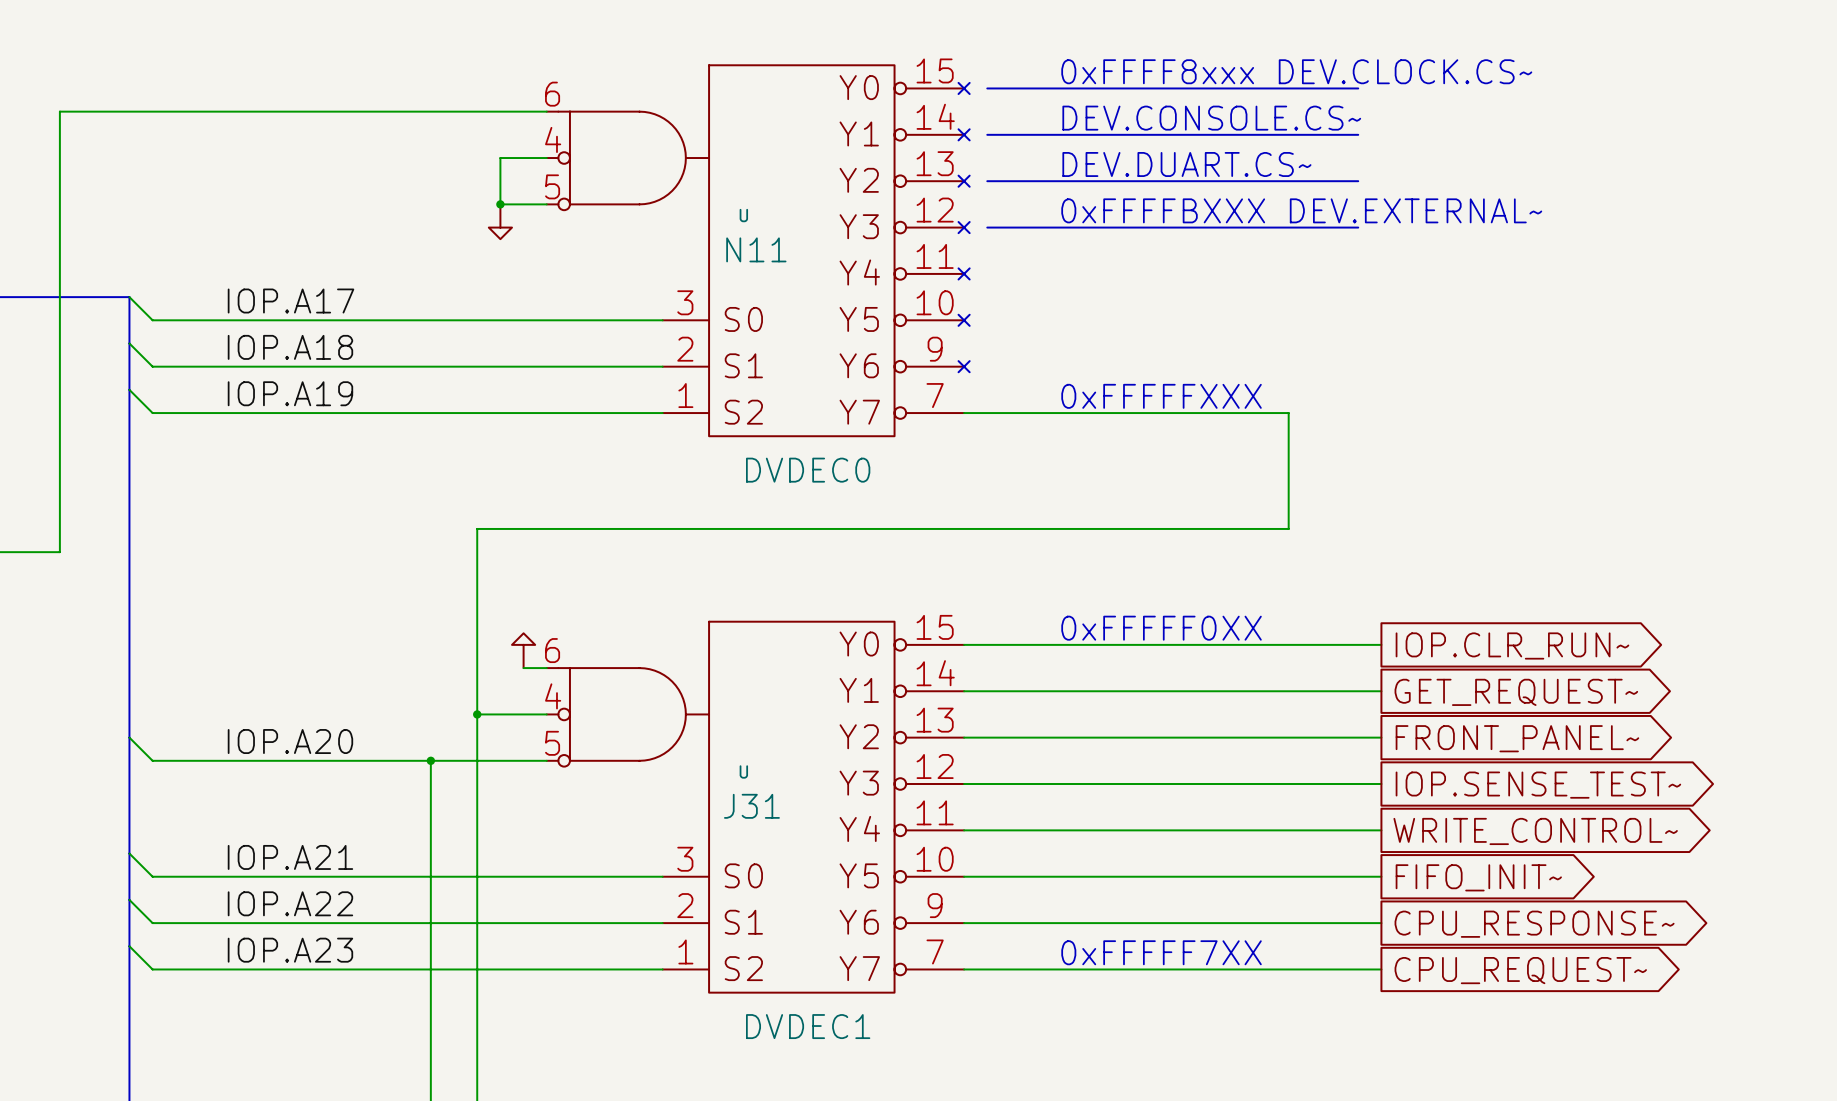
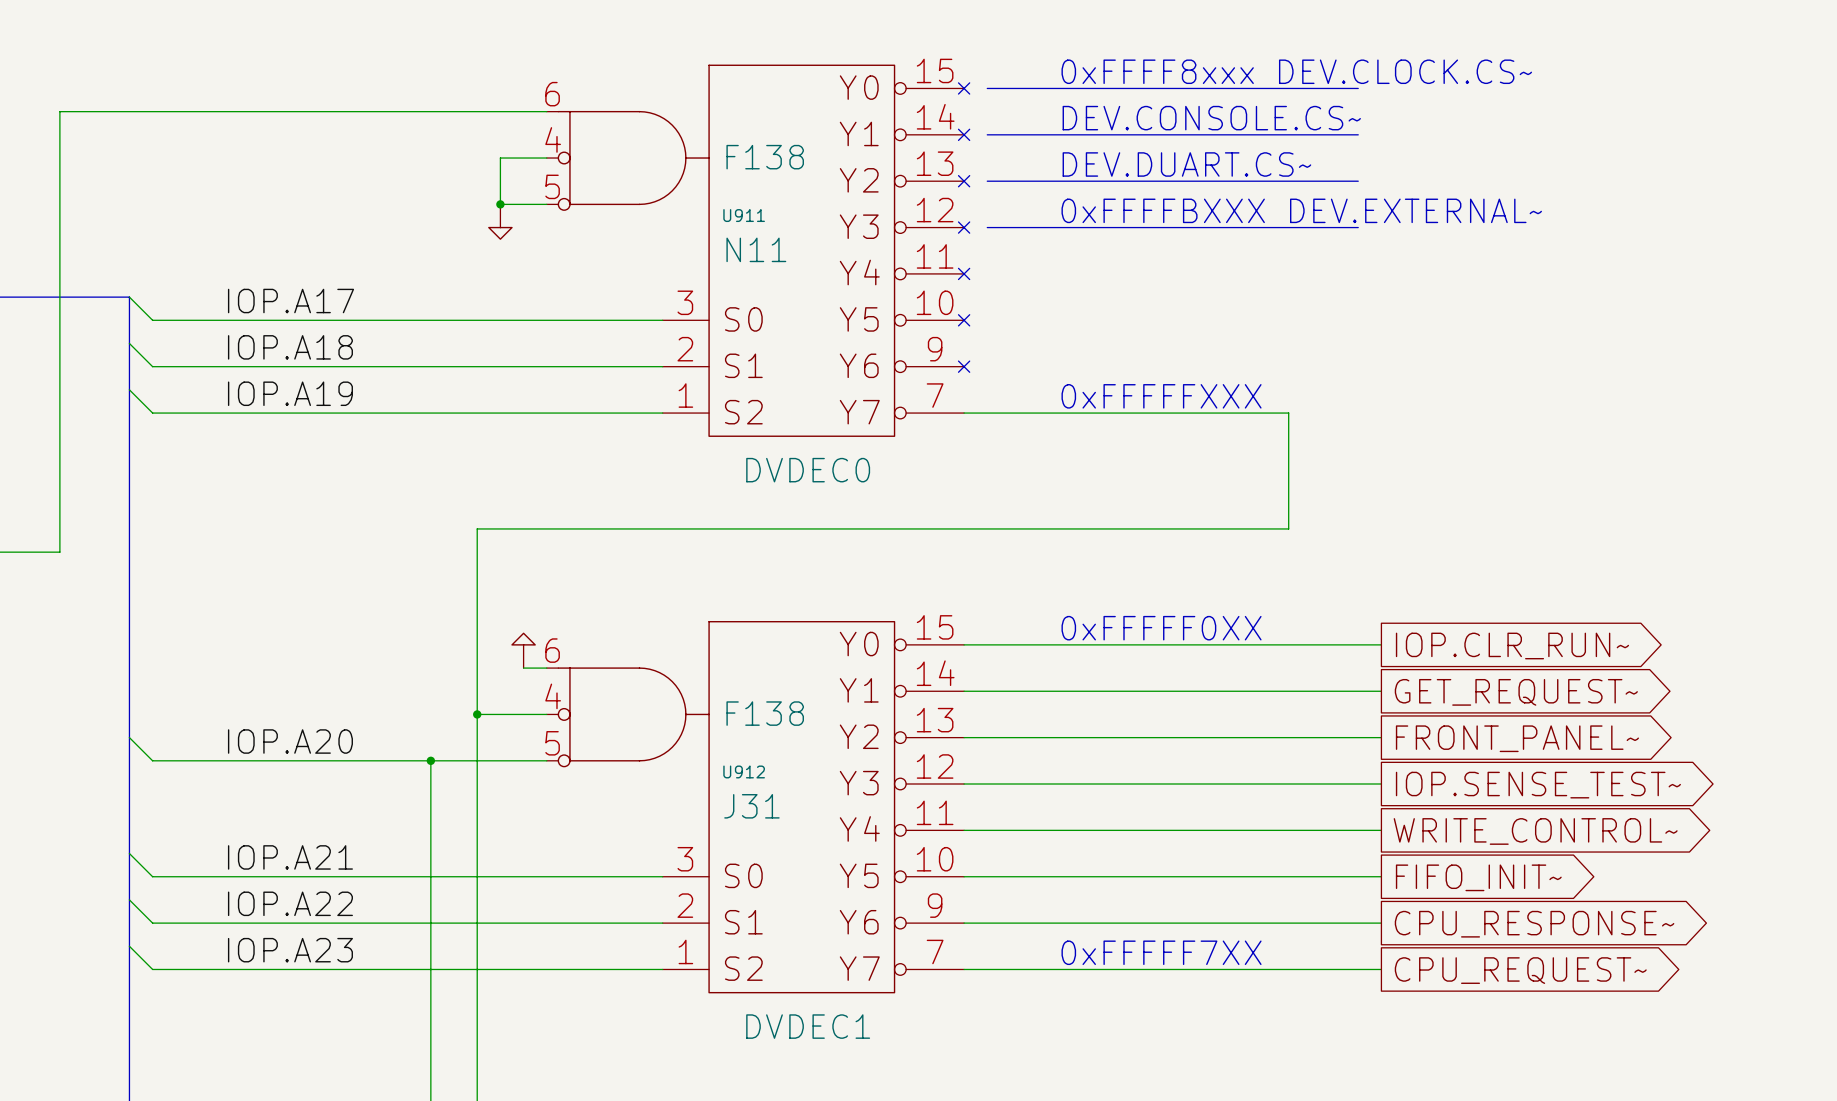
U value: none -> F138 (765, 157)
U name: U (743, 215) -> U911 (744, 215)
U value: none -> F138 (765, 713)
U name: U (743, 771) -> U912 (744, 771)

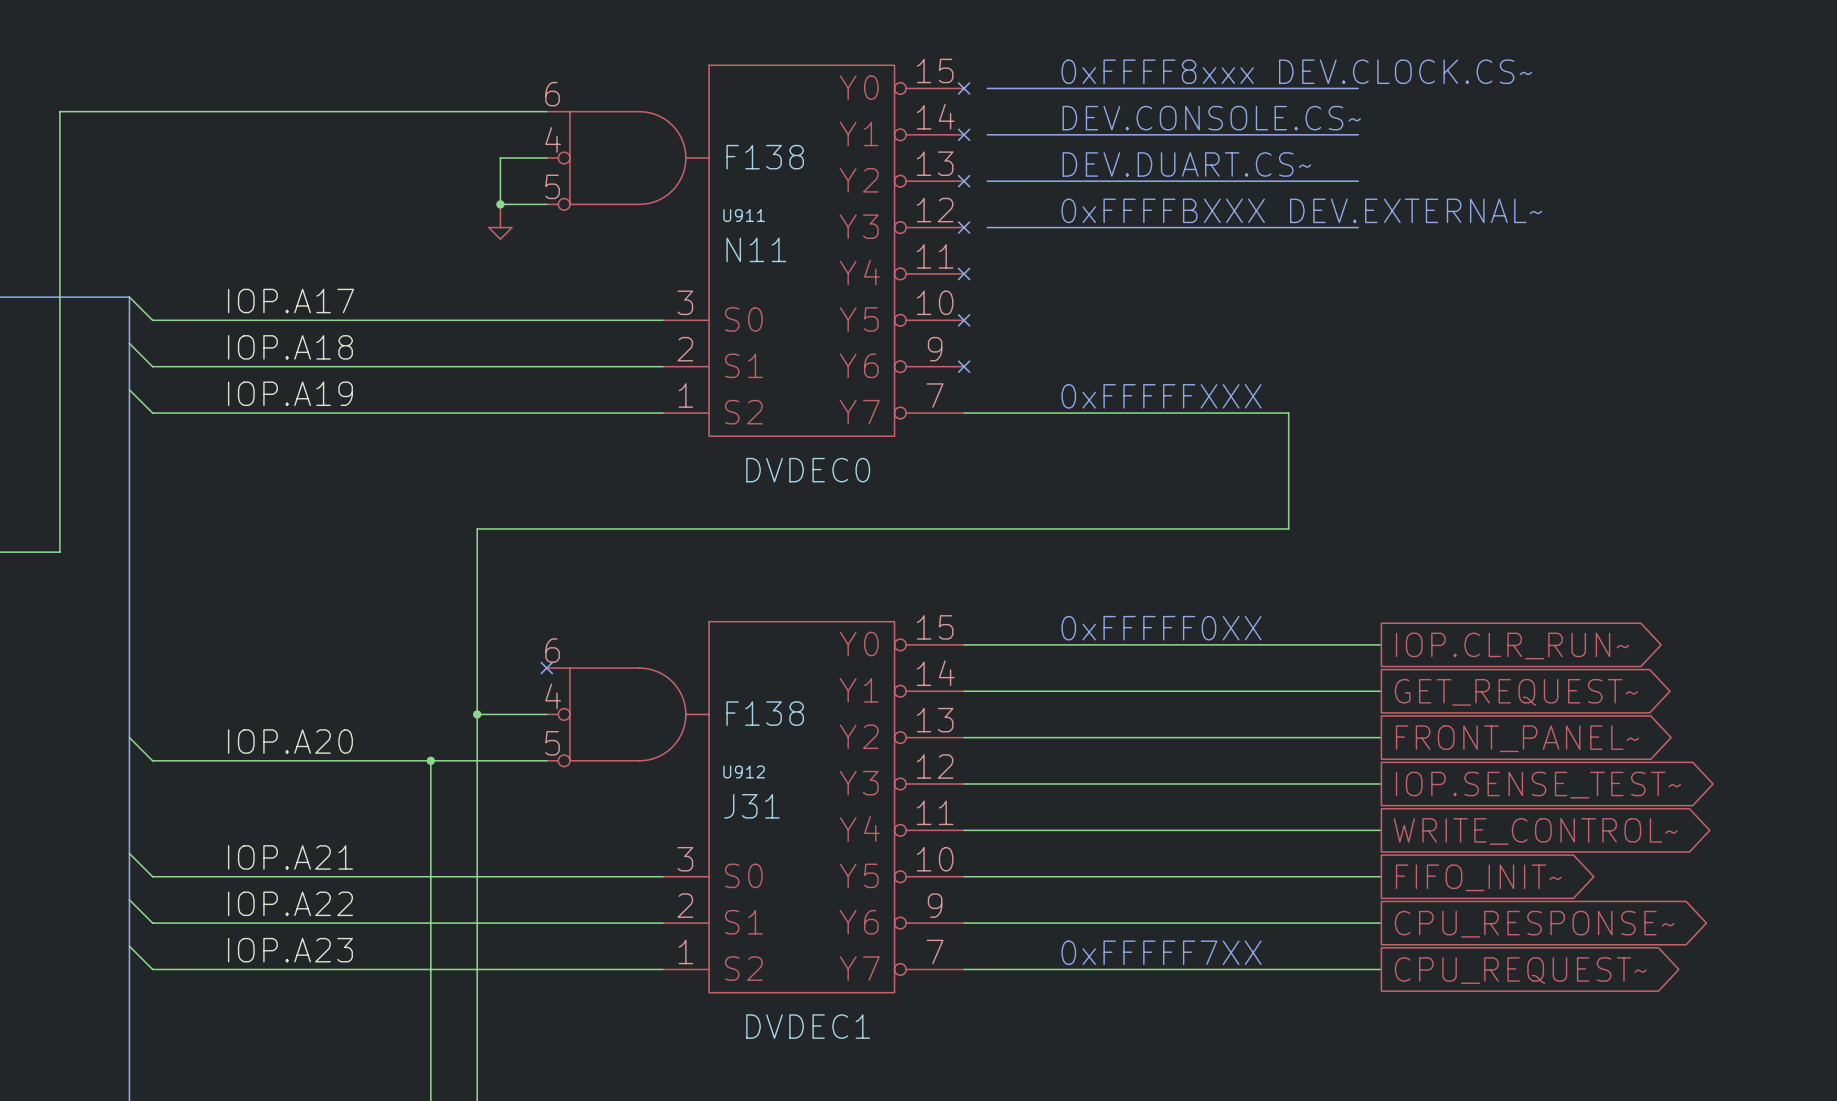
power symbol: (523, 650) -> none
wire: (523, 668) (546, 668) -> none
no-connect mark: none -> (546, 668)

